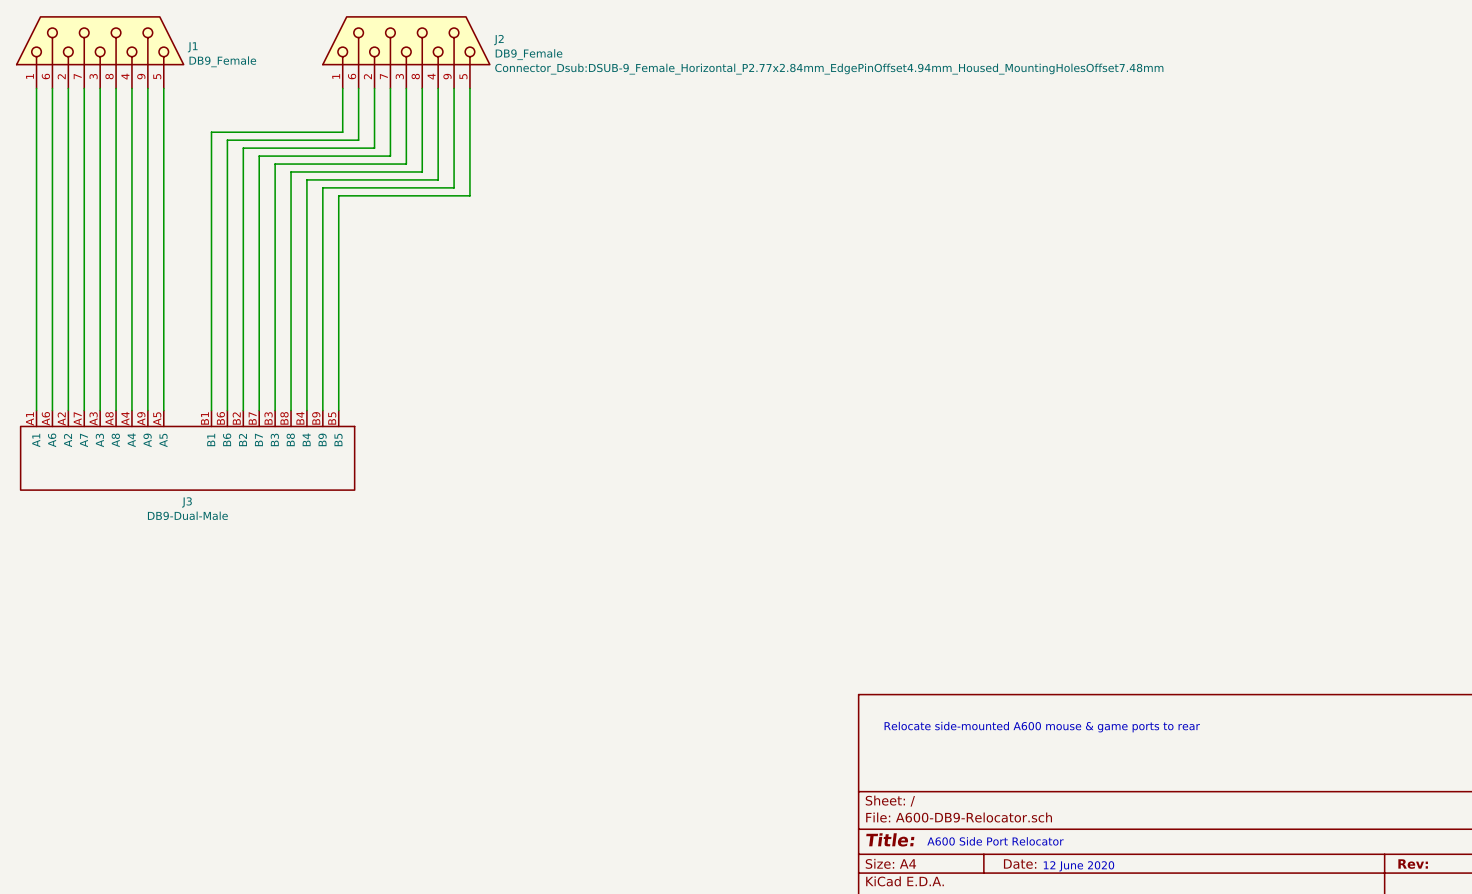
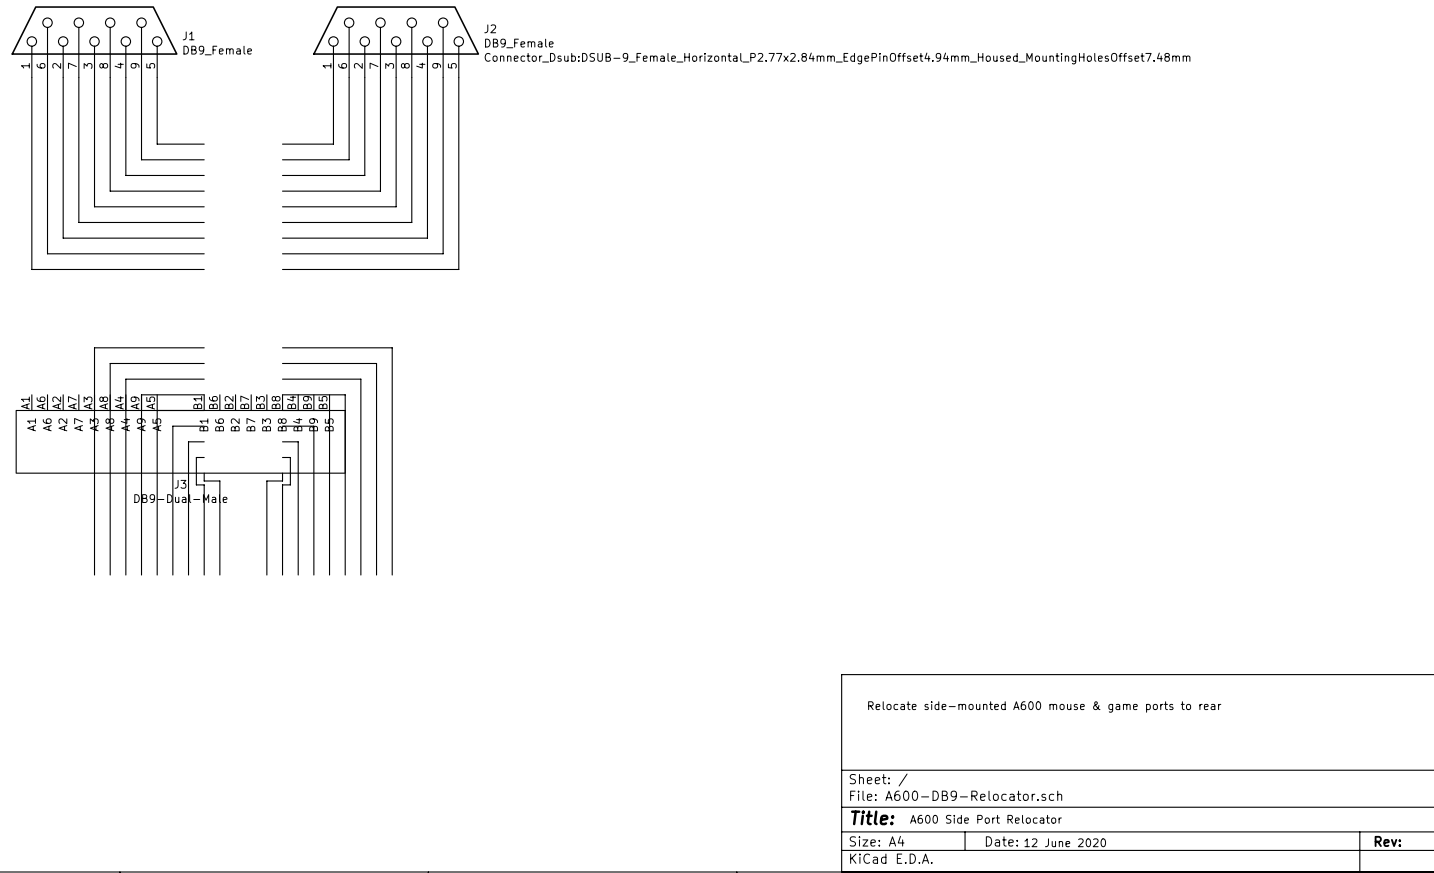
wire: (342, 132) (211, 132) (211, 410) -> (141, 575) (141, 394) (204, 394)
wire: (358, 140) (227, 140) (227, 410) -> none
wire: (374, 148) (243, 148) (243, 410) -> none
wire: (163, 156) (163, 410) -> (157, 144) (204, 144)
wire: (291, 156) (259, 156) (259, 410) -> none
wire: (342, 156) (390, 156) -> (333, 144) (333, 120)
wire: none -> (380, 144) (380, 191) (282, 191)
wire: (406, 164) (275, 164) (275, 410) -> (396, 151) (396, 206) (282, 206)
wire: (147, 171) (147, 410) -> (141, 159) (204, 159)
wire: (291, 171) (291, 410) -> (345, 575) (345, 394) (282, 394)
wire: (358, 171) (422, 171) -> (349, 159) (349, 128)
wire: none -> (411, 159) (411, 222) (282, 222)
wire: (438, 179) (306, 179) (306, 410) -> (427, 167) (427, 238) (282, 238)
wire: (131, 187) (131, 394) -> (125, 175) (204, 175)
wire: (322, 187) (322, 410) -> (313, 175) (282, 175)
wire: (374, 187) (454, 187) -> (364, 175) (364, 136)
wire: none -> (443, 175) (443, 253) (282, 253)
wire: (469, 195) (338, 195) (338, 410) -> (458, 183) (458, 269) (282, 269)
wire: (116, 203) (116, 378) -> (110, 191) (204, 191)
wire: (100, 219) (100, 362) -> (94, 206) (204, 206)
wire: (84, 235) (84, 410) -> (78, 222) (204, 222)
wire: (68, 251) (68, 410) -> (63, 238) (204, 238)
wire: (52, 267) (52, 410) -> (47, 253) (204, 253)
wire: (36, 283) (36, 410) -> (31, 269) (204, 269)
wire: none -> (94, 347) (204, 347)
wire: none -> (282, 347) (392, 347) (392, 575)
wire: none -> (110, 363) (204, 363)
wire: none -> (282, 363) (376, 363) (376, 575)
wire: none -> (125, 379) (204, 379)
wire: none -> (282, 379) (360, 379) (360, 575)
wire: none -> (94, 394) (94, 575)
wire: none -> (110, 394) (110, 575)
wire: none -> (125, 394) (125, 575)
wire: none -> (204, 410) (157, 410) (157, 575)
wire: none -> (282, 410) (329, 410) (329, 575)
wire: none -> (204, 426) (172, 426) (172, 575)
wire: none -> (282, 426) (313, 426) (313, 575)
wire: none -> (204, 441) (188, 441) (188, 575)
wire: none -> (282, 441) (298, 441) (298, 575)
wire: none -> (204, 457) (196, 457) (196, 484) (204, 484) (204, 575)
wire: none -> (282, 457) (290, 457) (290, 484) (282, 484) (282, 575)
wire: none -> (204, 473) (204, 481) (219, 481) (219, 575)
wire: none -> (282, 473) (282, 481) (266, 481) (266, 575)

